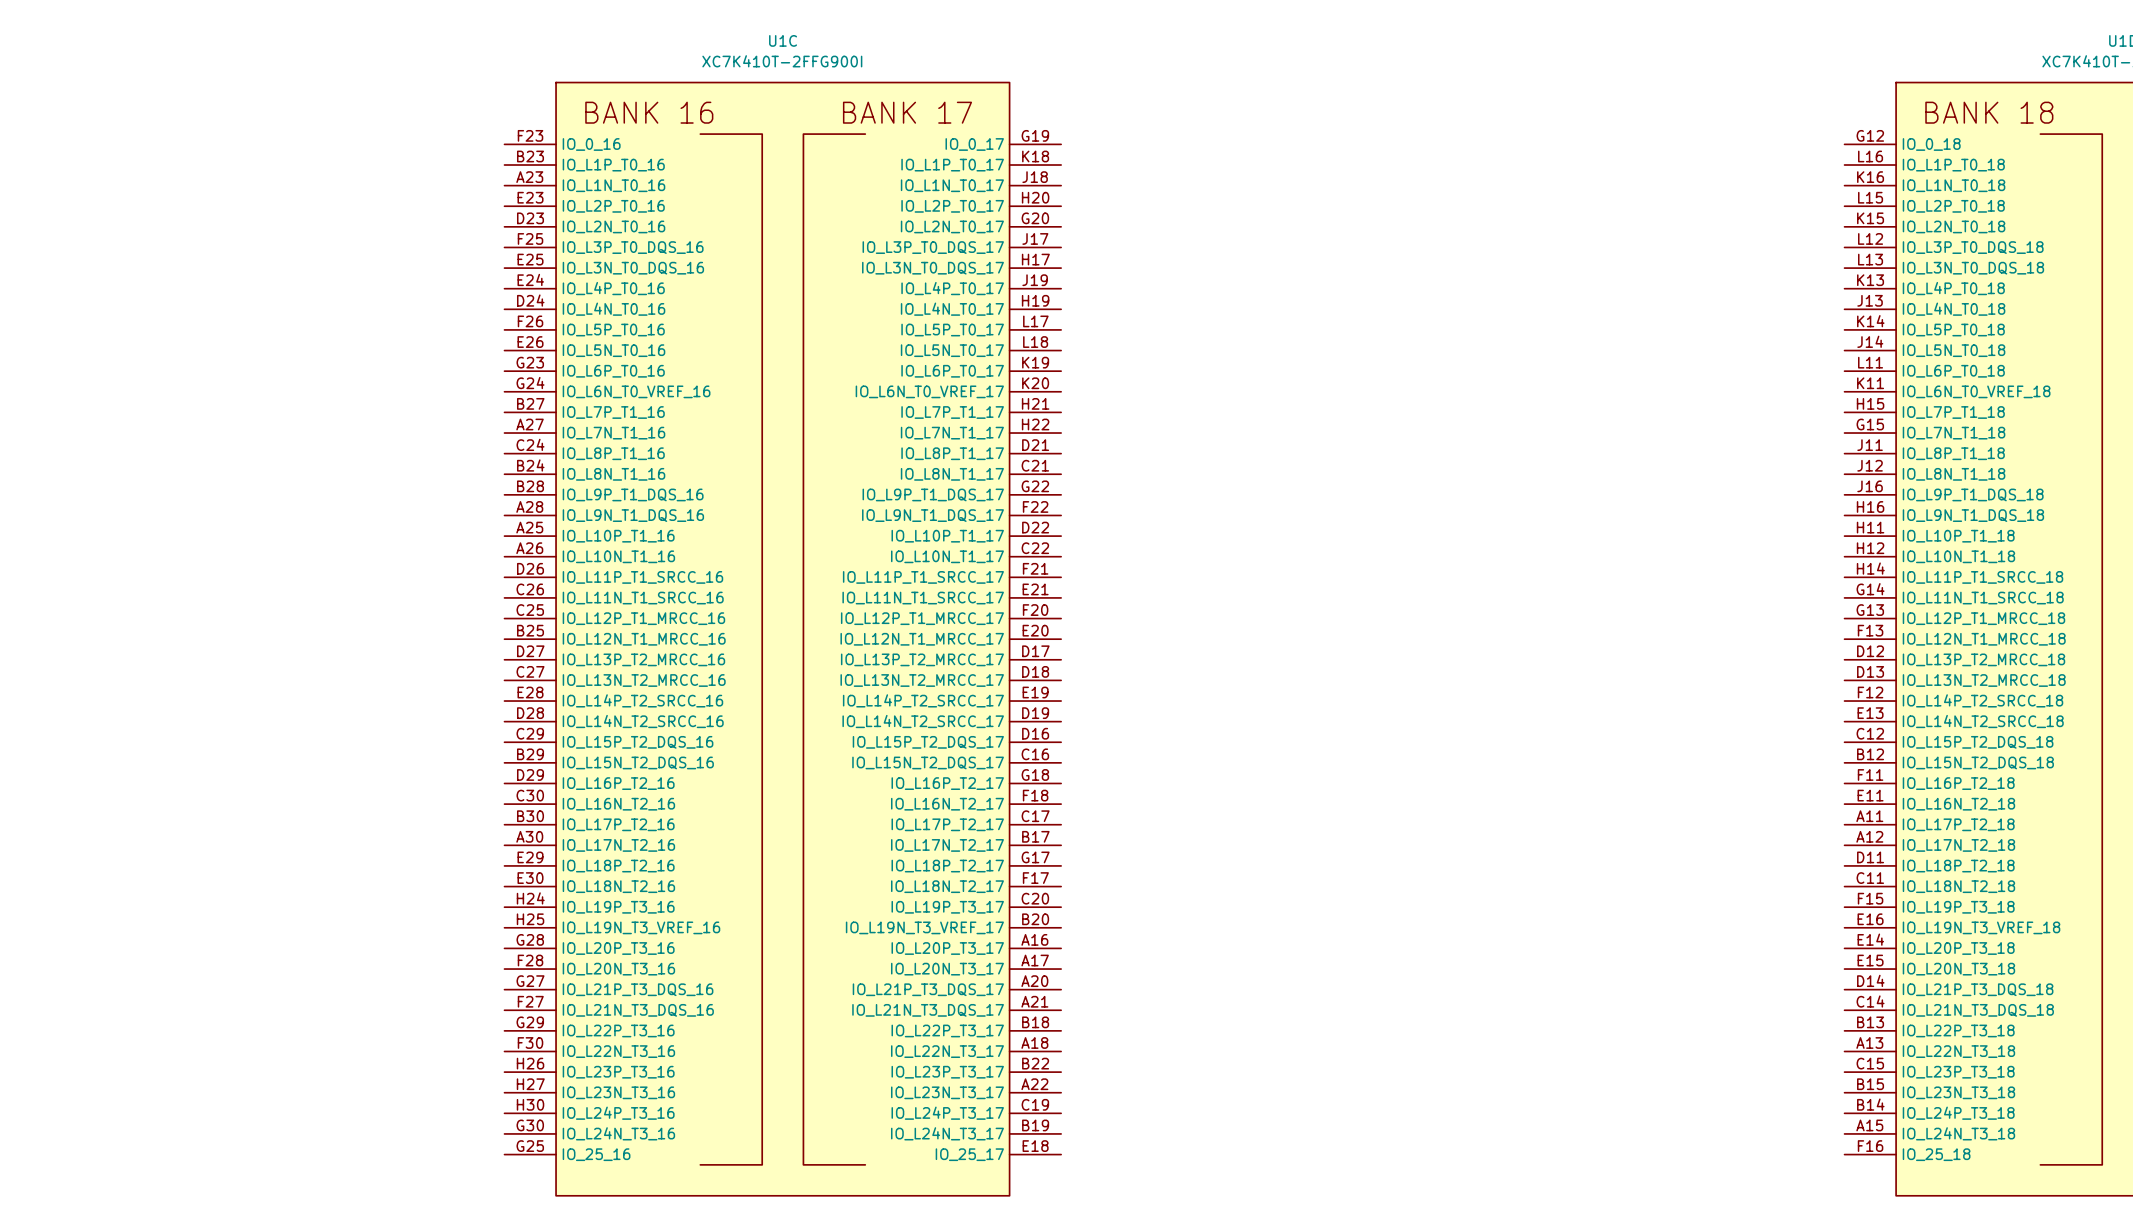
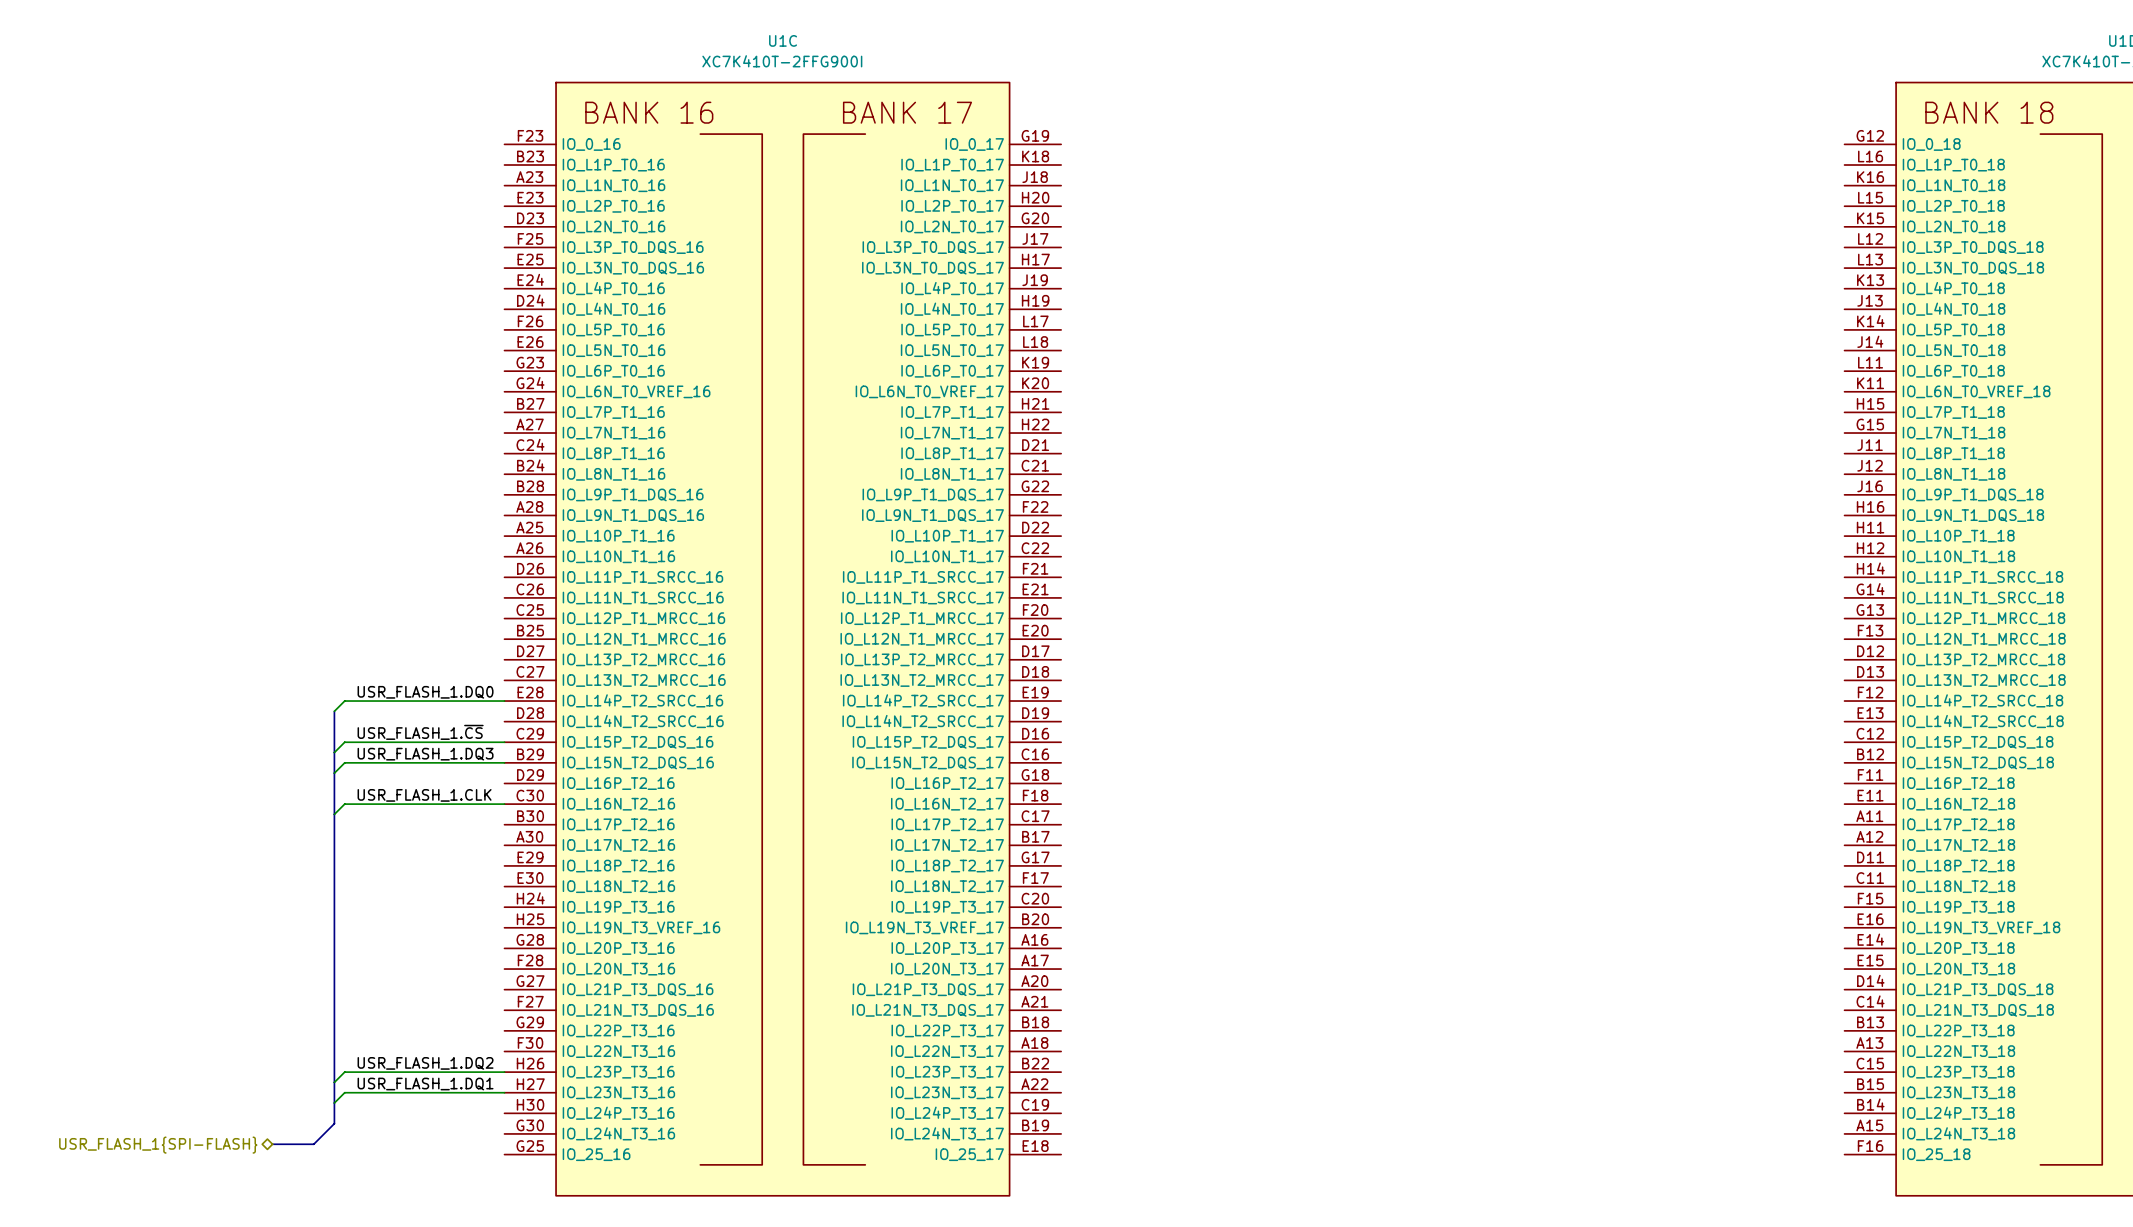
label: none -> USR_FLASH_1.DQ0 (425, 692)
wire: none -> (504, 701) (344, 701) (334, 711)
bus: none -> (334, 711) (334, 1123) (313, 1144) (272, 1144)
label: none -> USR_FLASH_1.~{CS} (420, 732)
wire: none -> (504, 742) (344, 742) (334, 752)
label: none -> USR_FLASH_1.DQ3 (425, 754)
wire: none -> (504, 762) (344, 762) (334, 773)
label: none -> USR_FLASH_1.CLK (424, 795)
wire: none -> (504, 804) (344, 804) (334, 814)
label: none -> USR_FLASH_1.DQ2 (425, 1063)
wire: none -> (504, 1072) (344, 1072) (334, 1082)
label: none -> USR_FLASH_1.DQ1 (425, 1084)
wire: none -> (504, 1092) (344, 1092) (334, 1103)
hierarchical label: none -> USR_FLASH_1{SPI-FLASH} (158, 1145)

